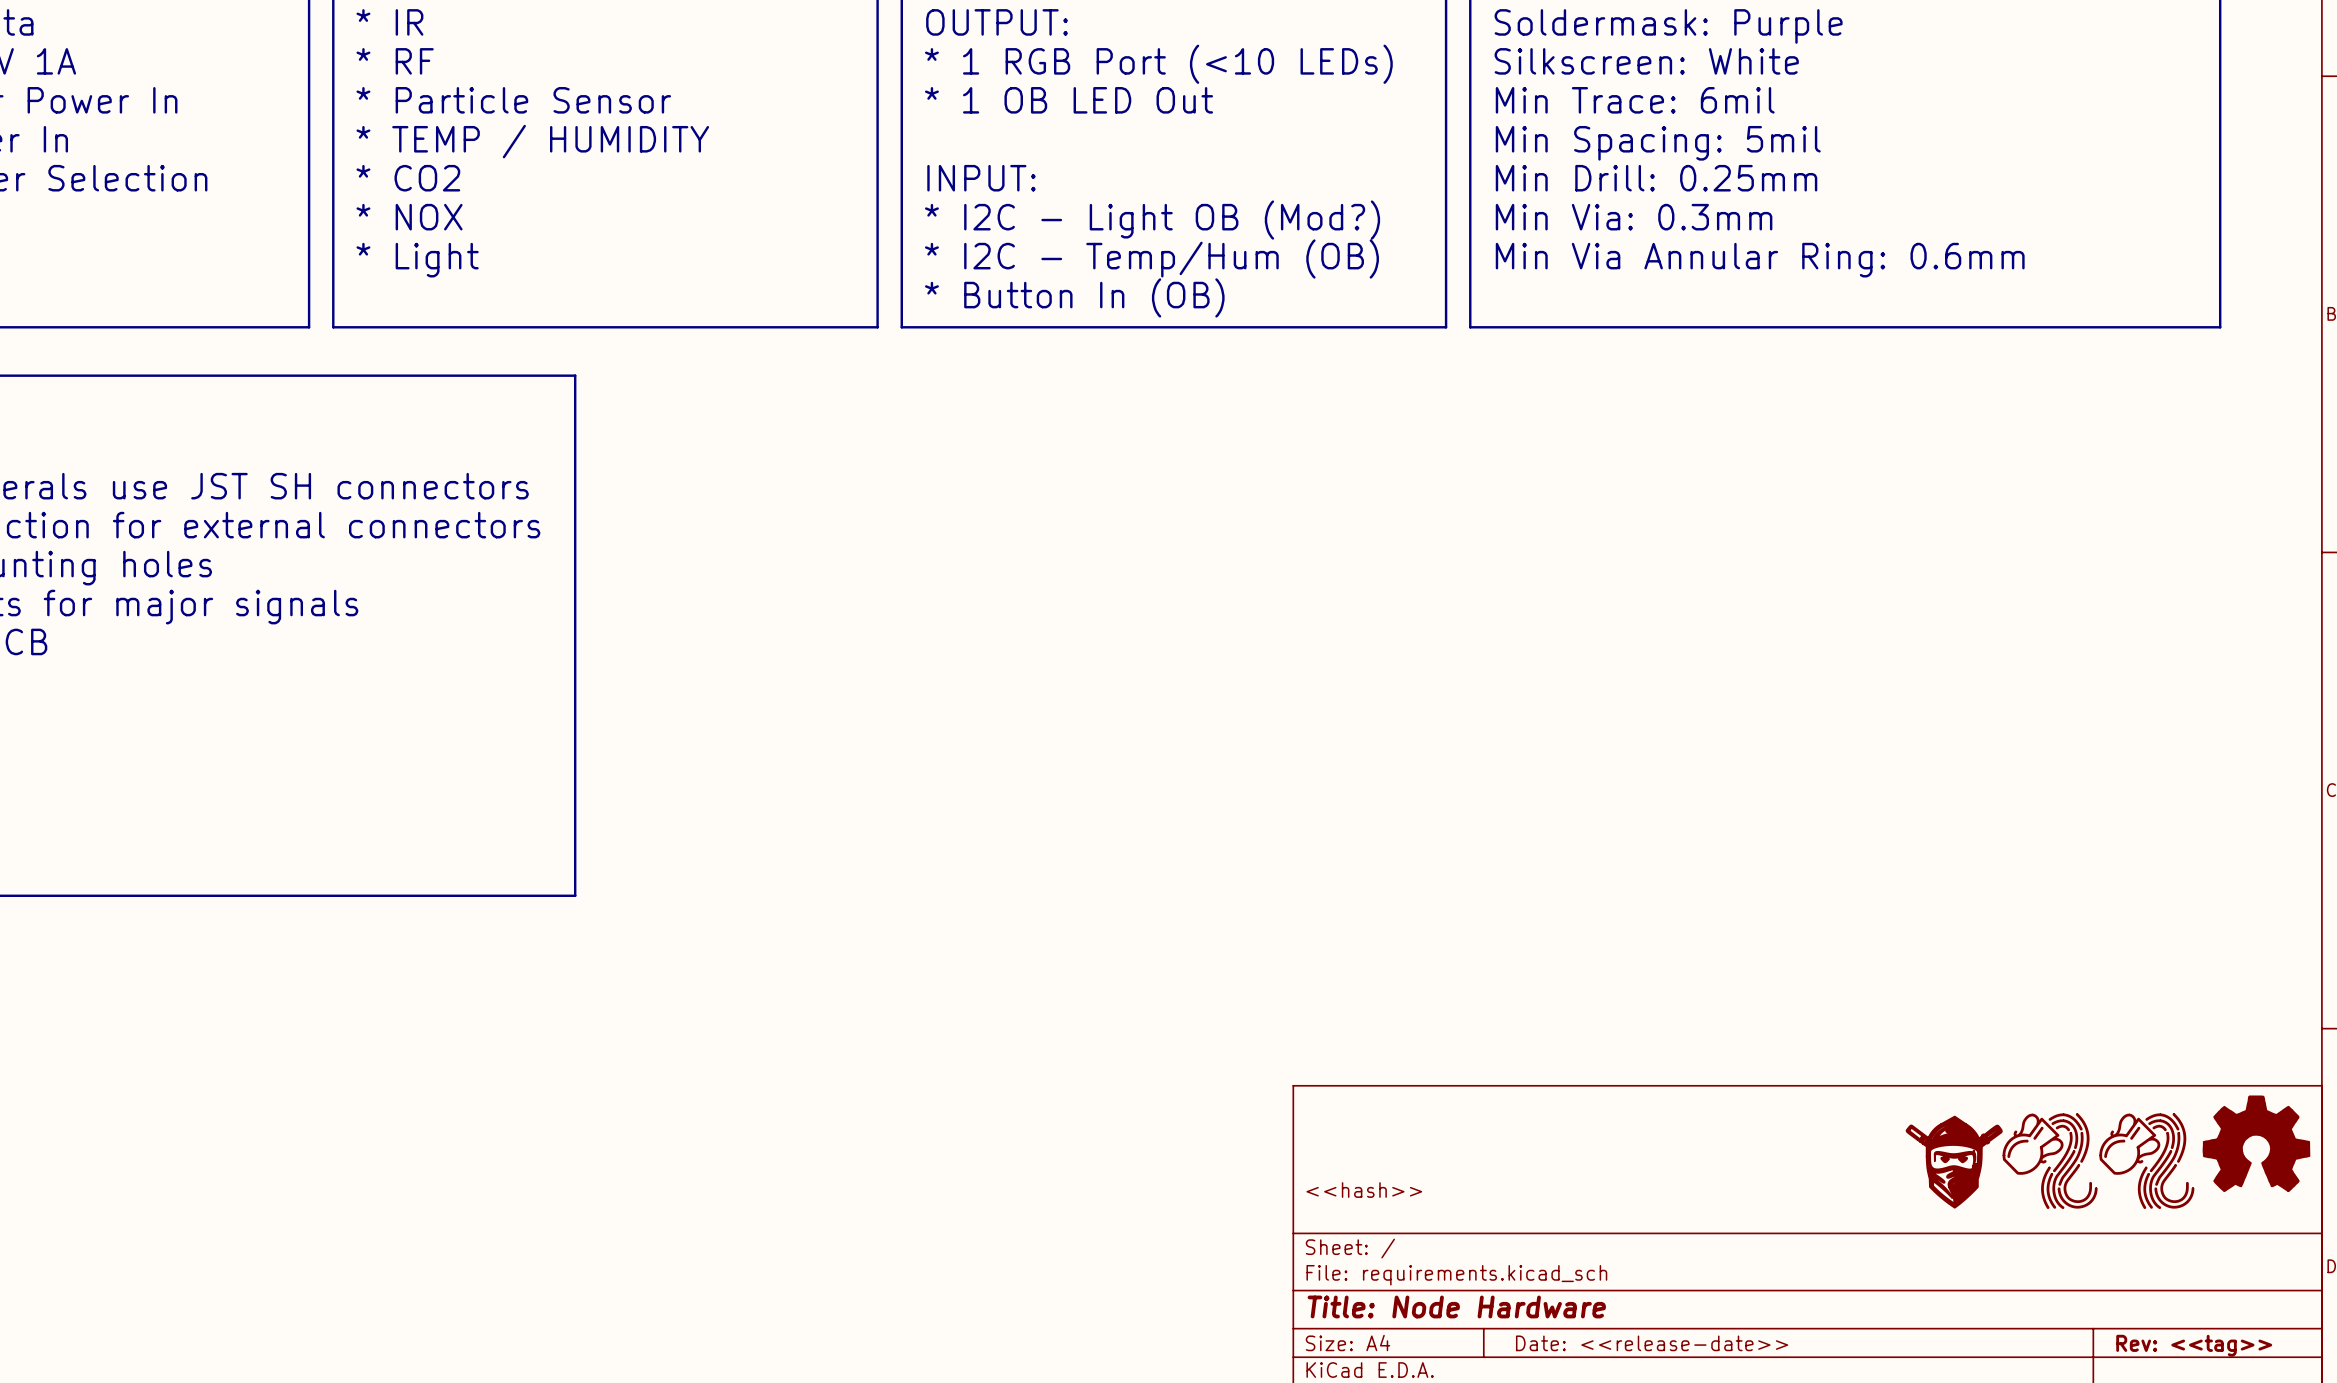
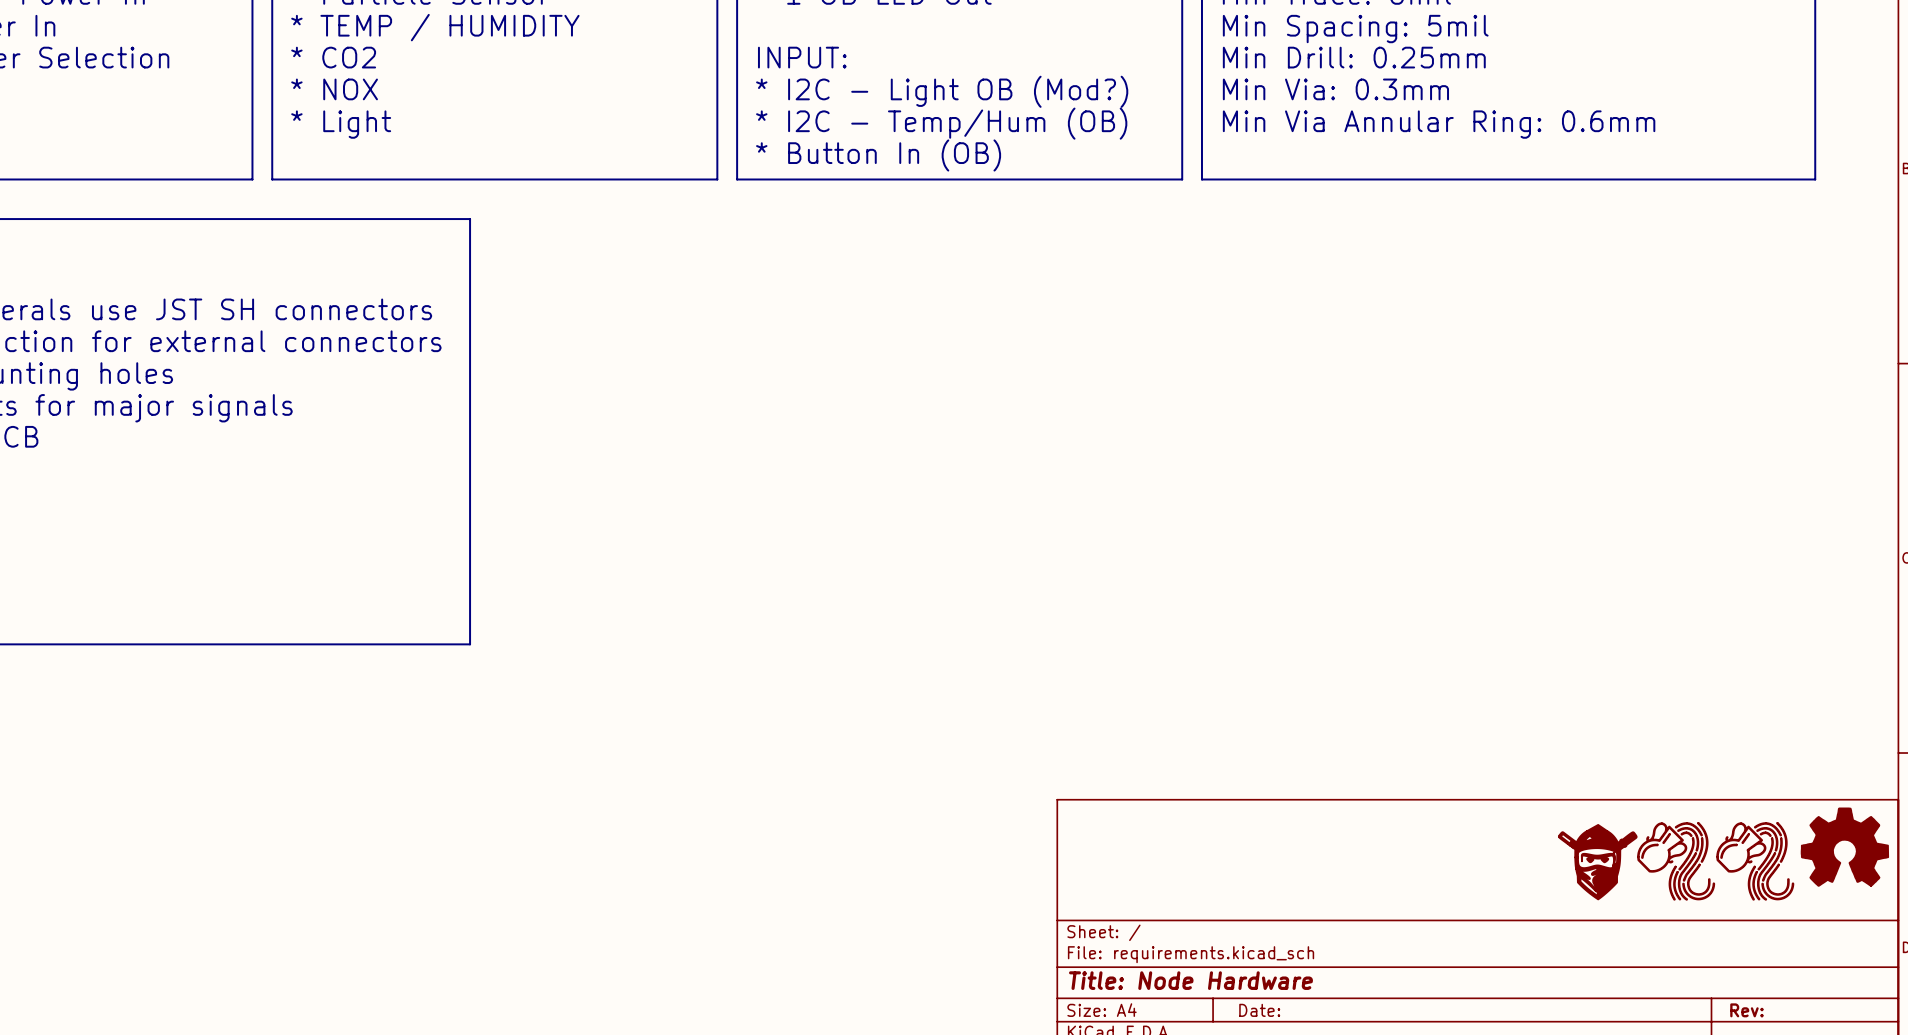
title block: <<hash>> (1364, 1190) -> none
title block: Date: <<release-date>> (1652, 1343) -> Date: (1259, 1010)
title block: Rev: <<tag>> (2194, 1345) -> Rev: (1746, 1010)

